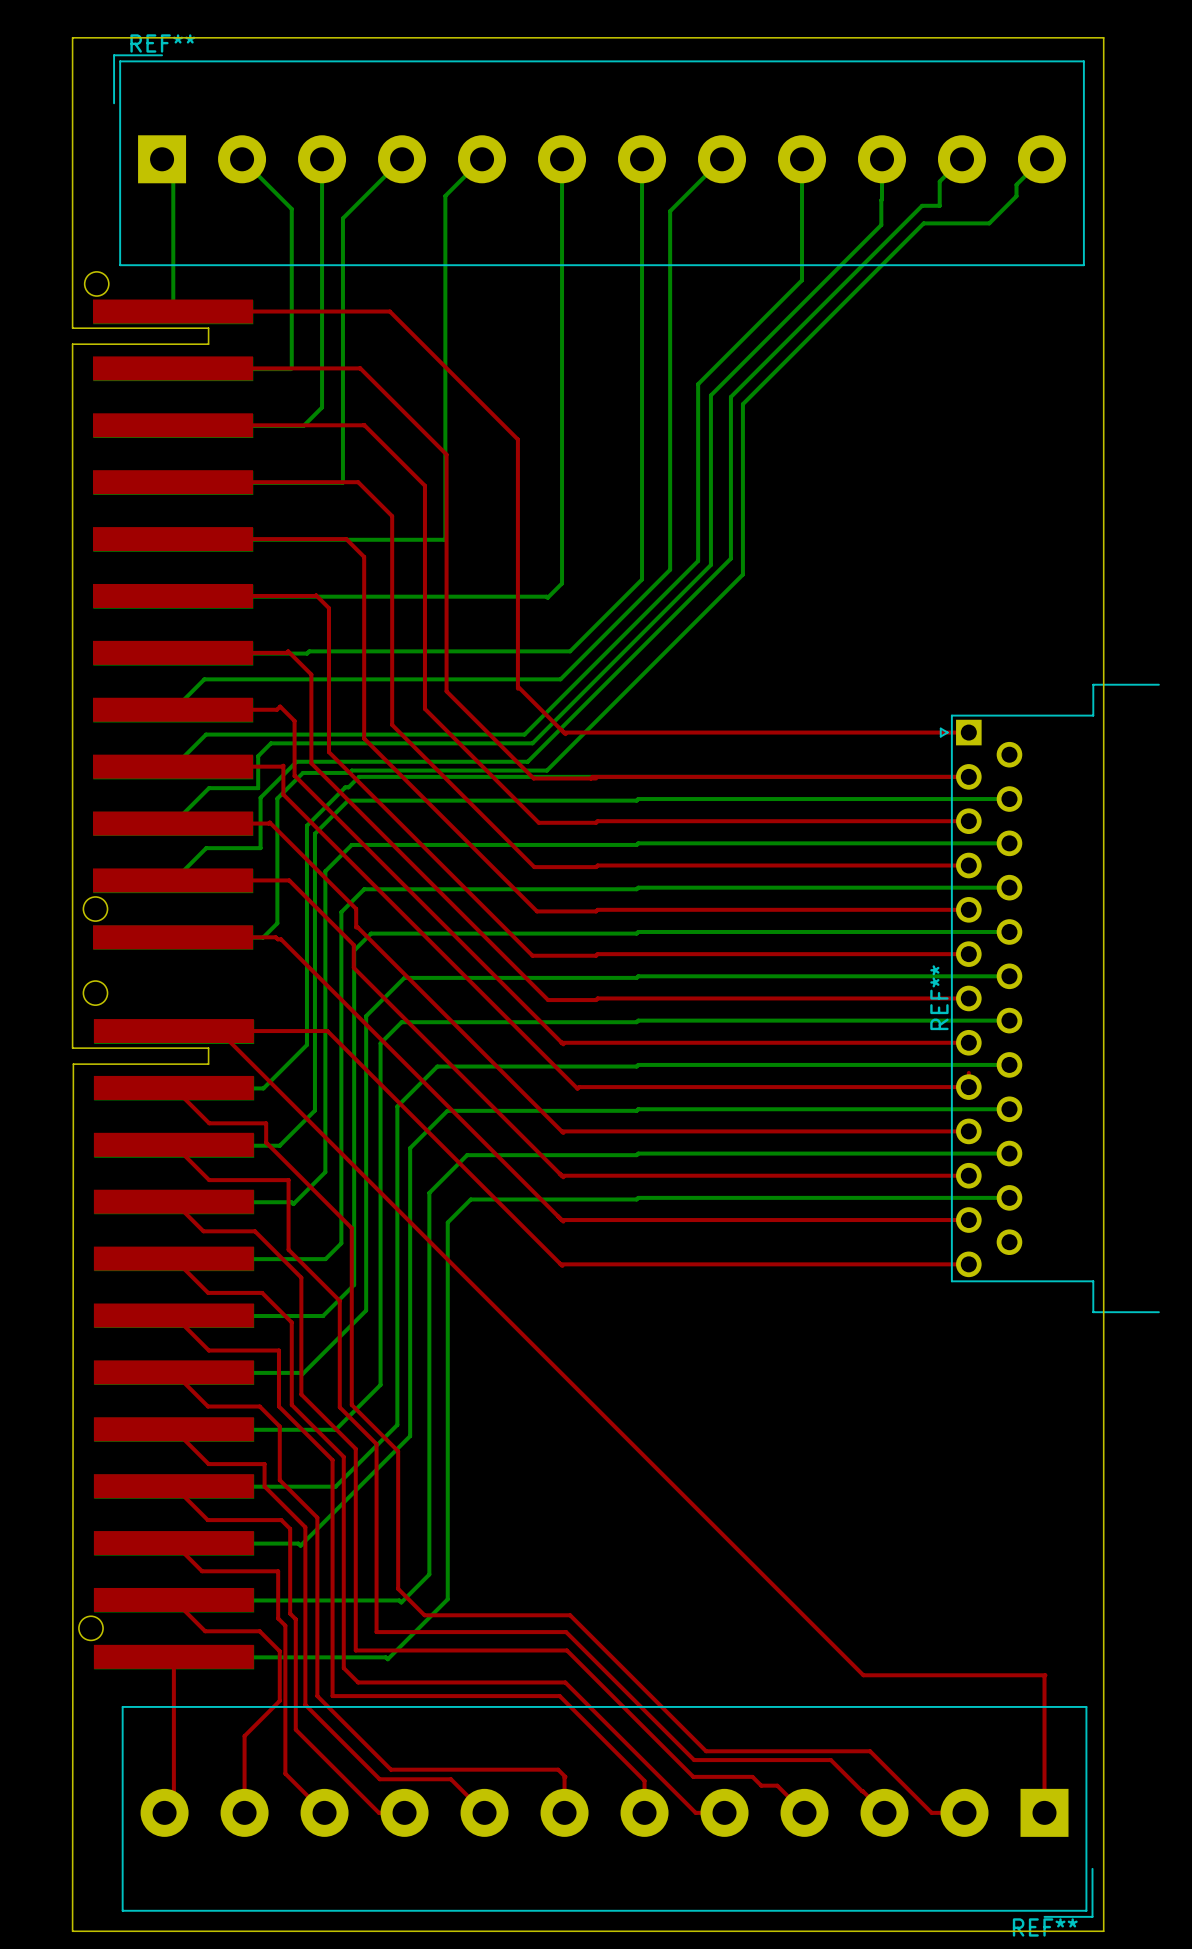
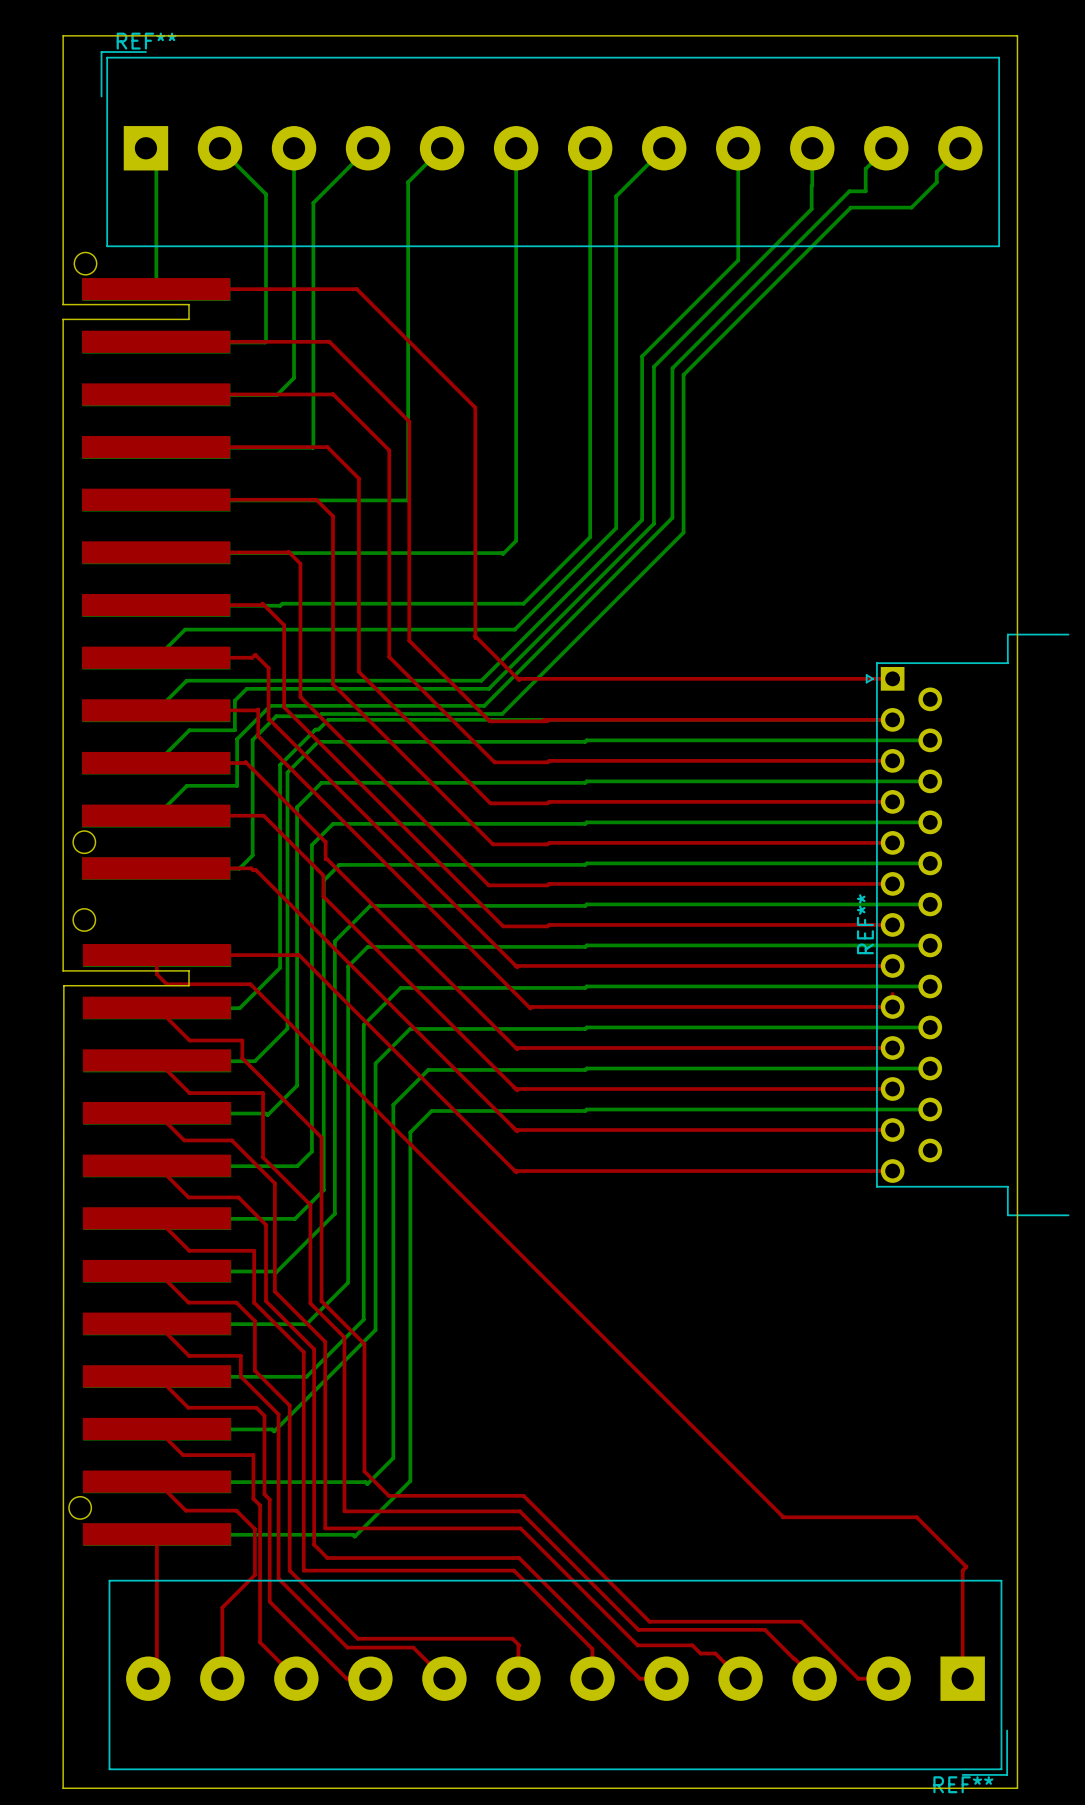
top track: (219, 1031) (863, 1675) (1045, 1675) (1044, 1696) -> (156, 955) (156, 974) (166, 984) (250, 984) (782, 1517) (916, 1517) (966, 1566) (962, 1570)

